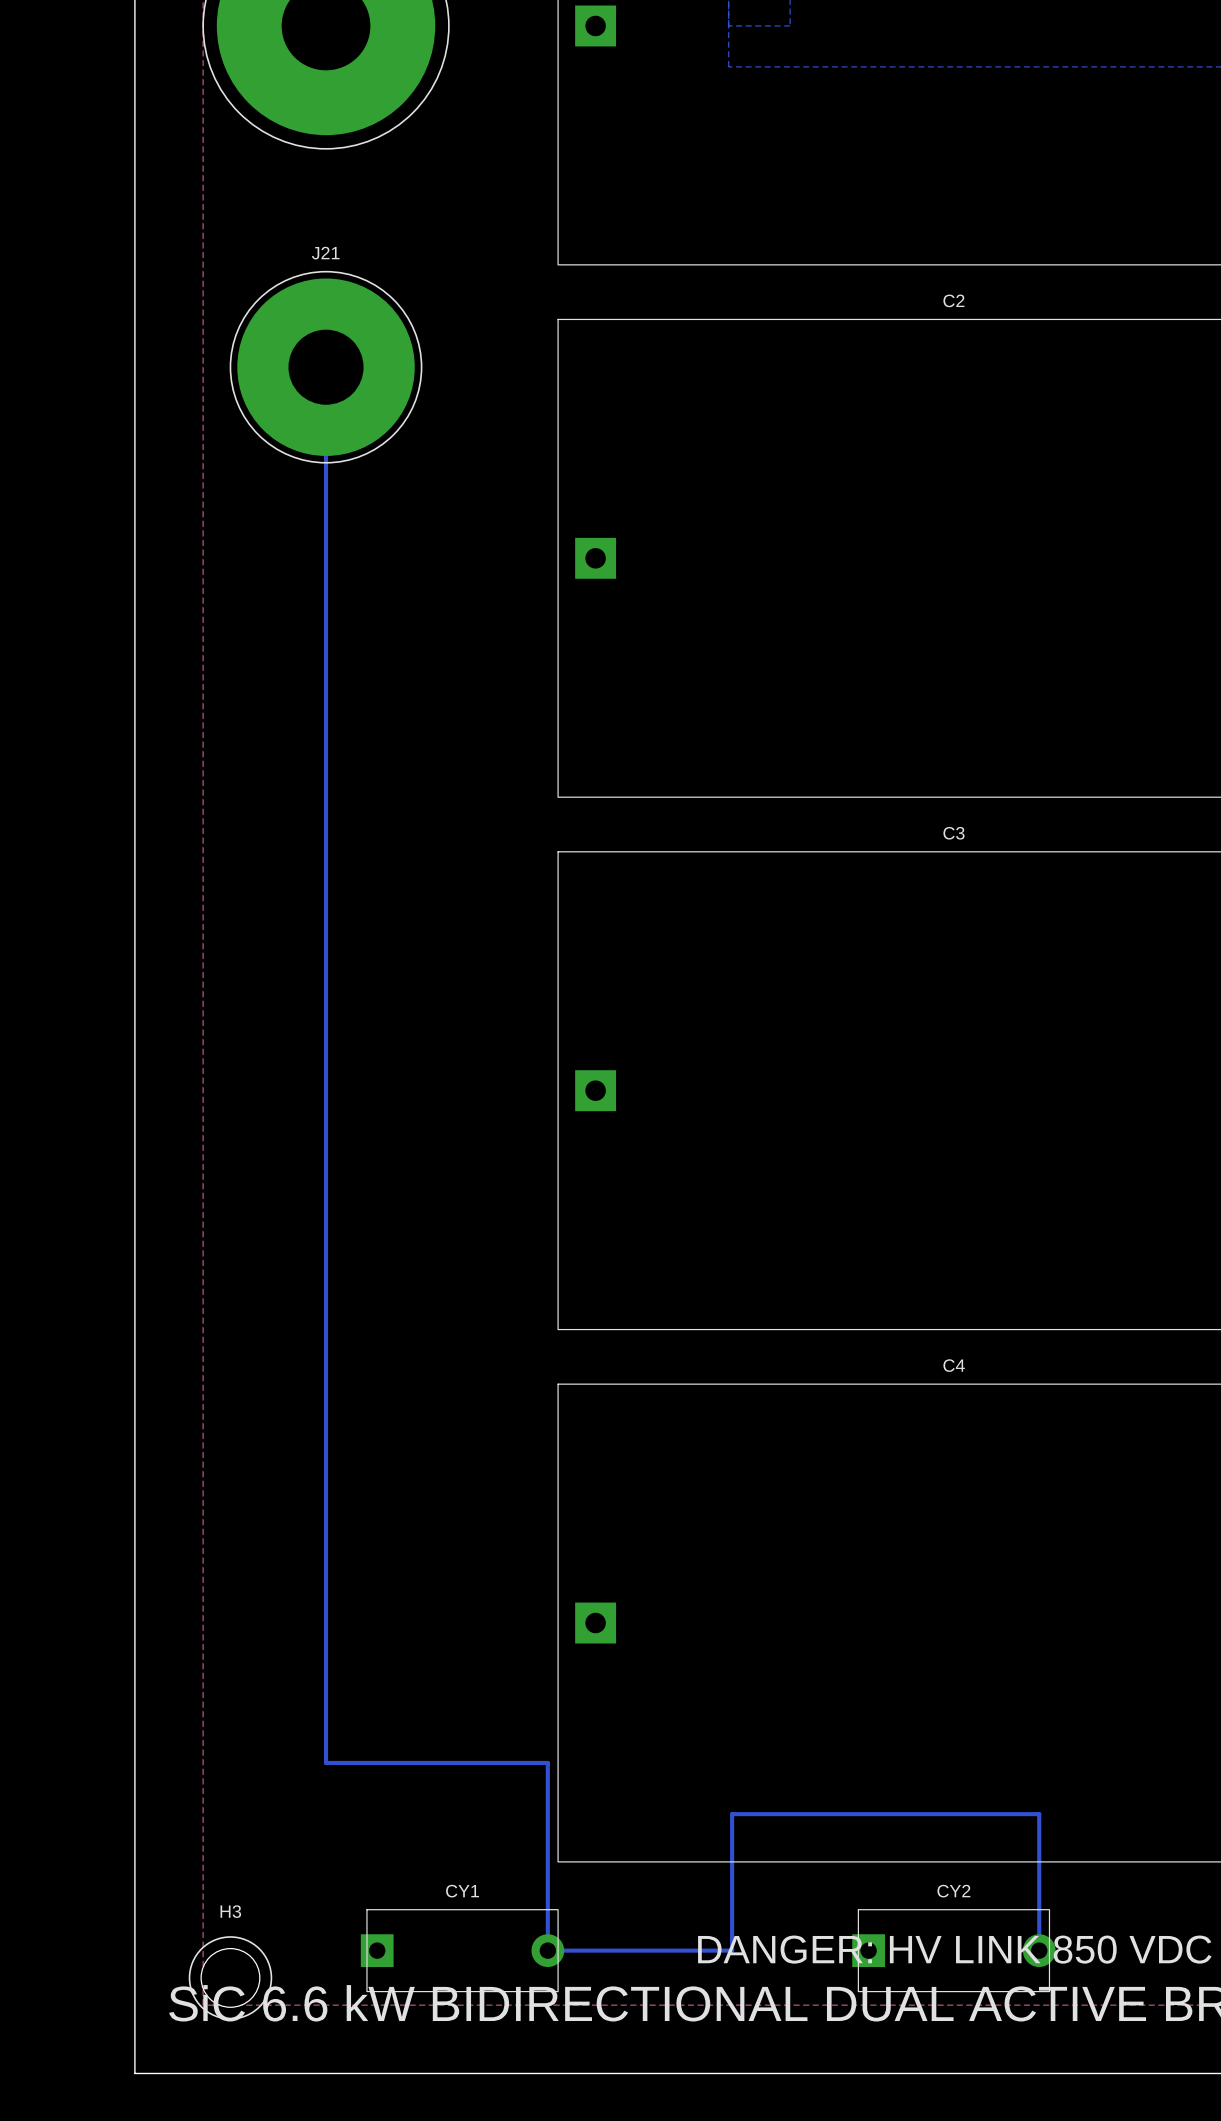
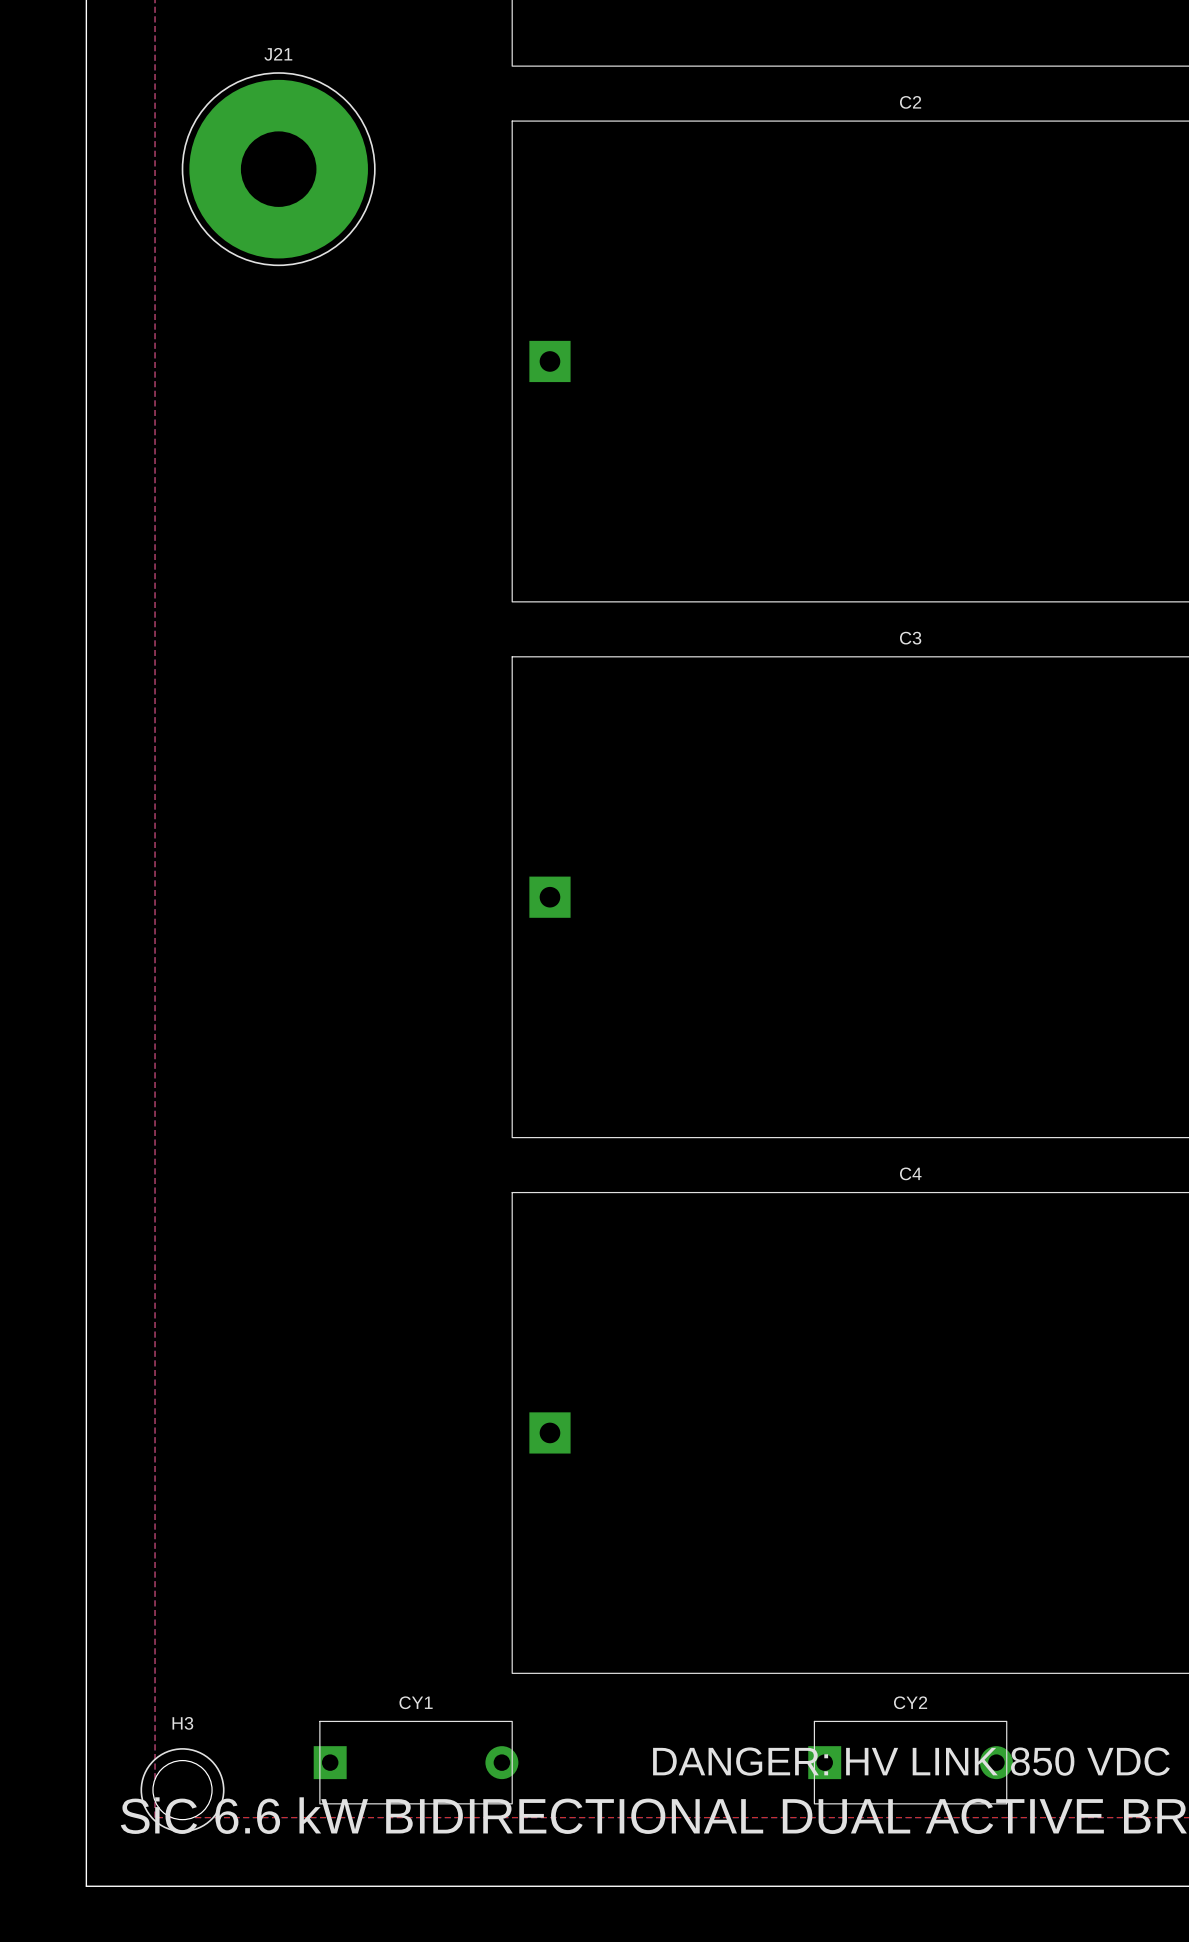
bottom track: (326, 367) (326, 1762) (547, 1762) (547, 1950) (732, 1950) (732, 1814) (1039, 1814) (1039, 1950) -> none

